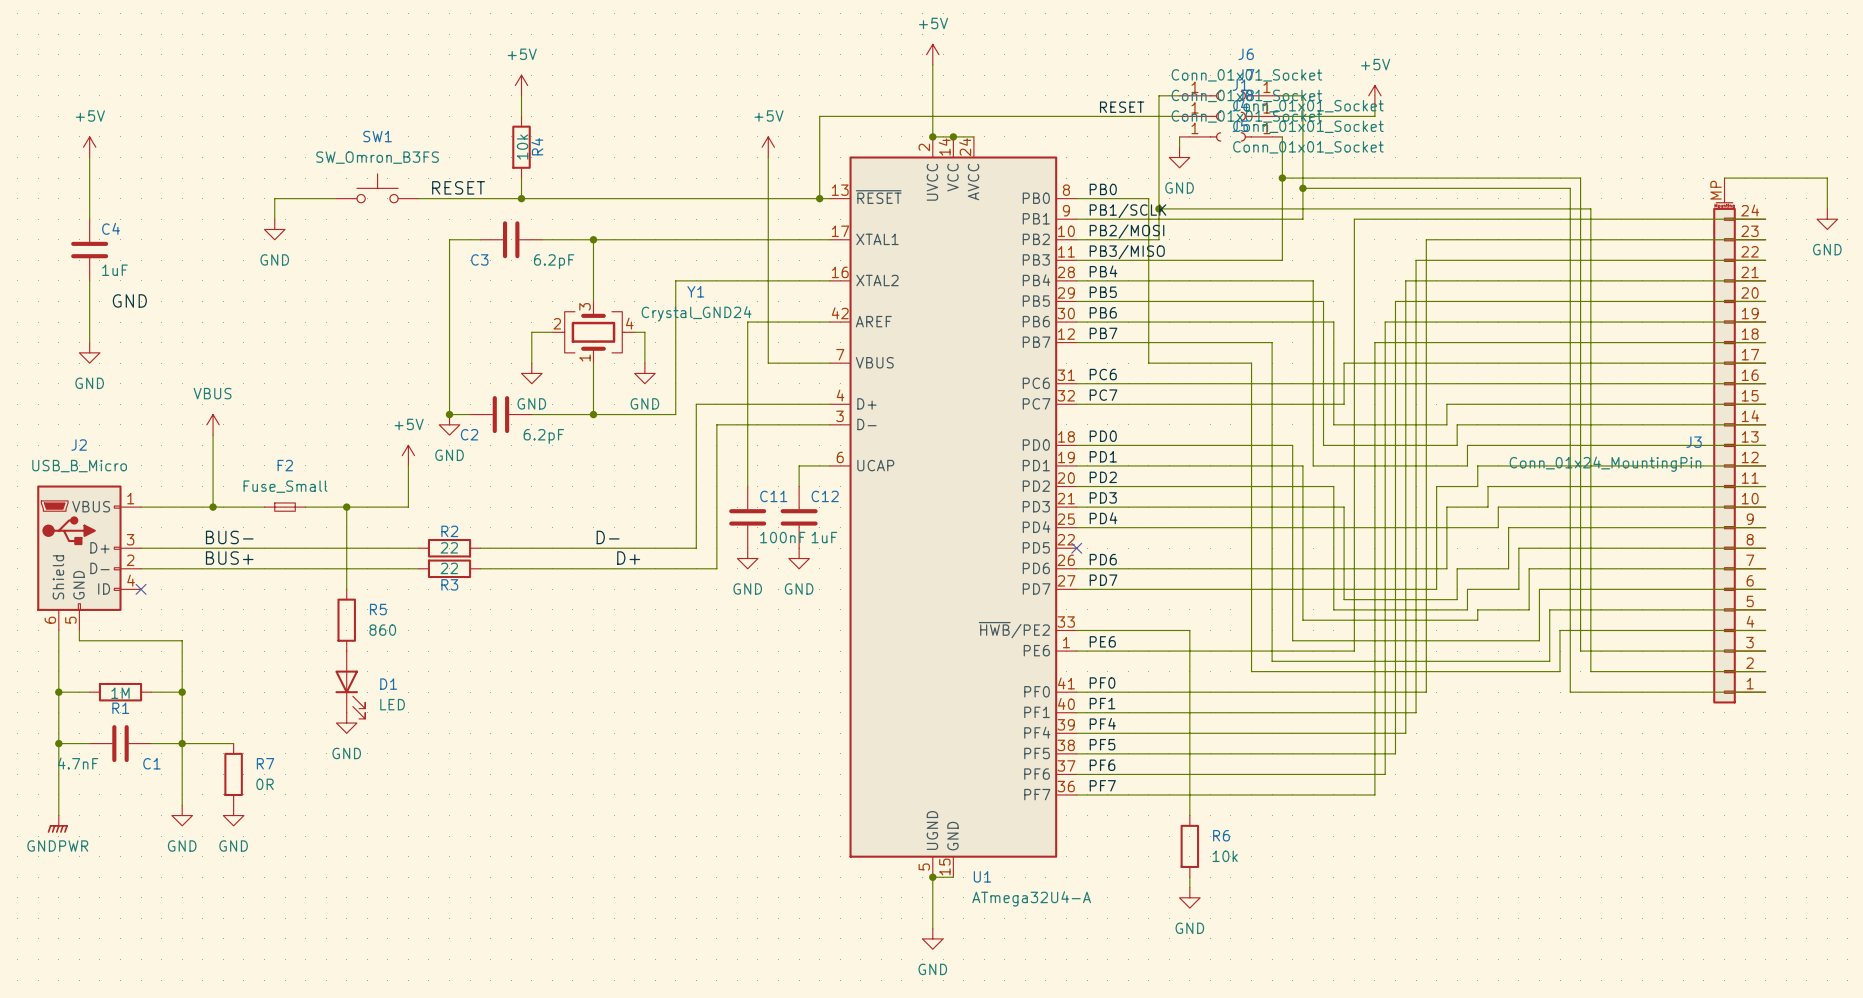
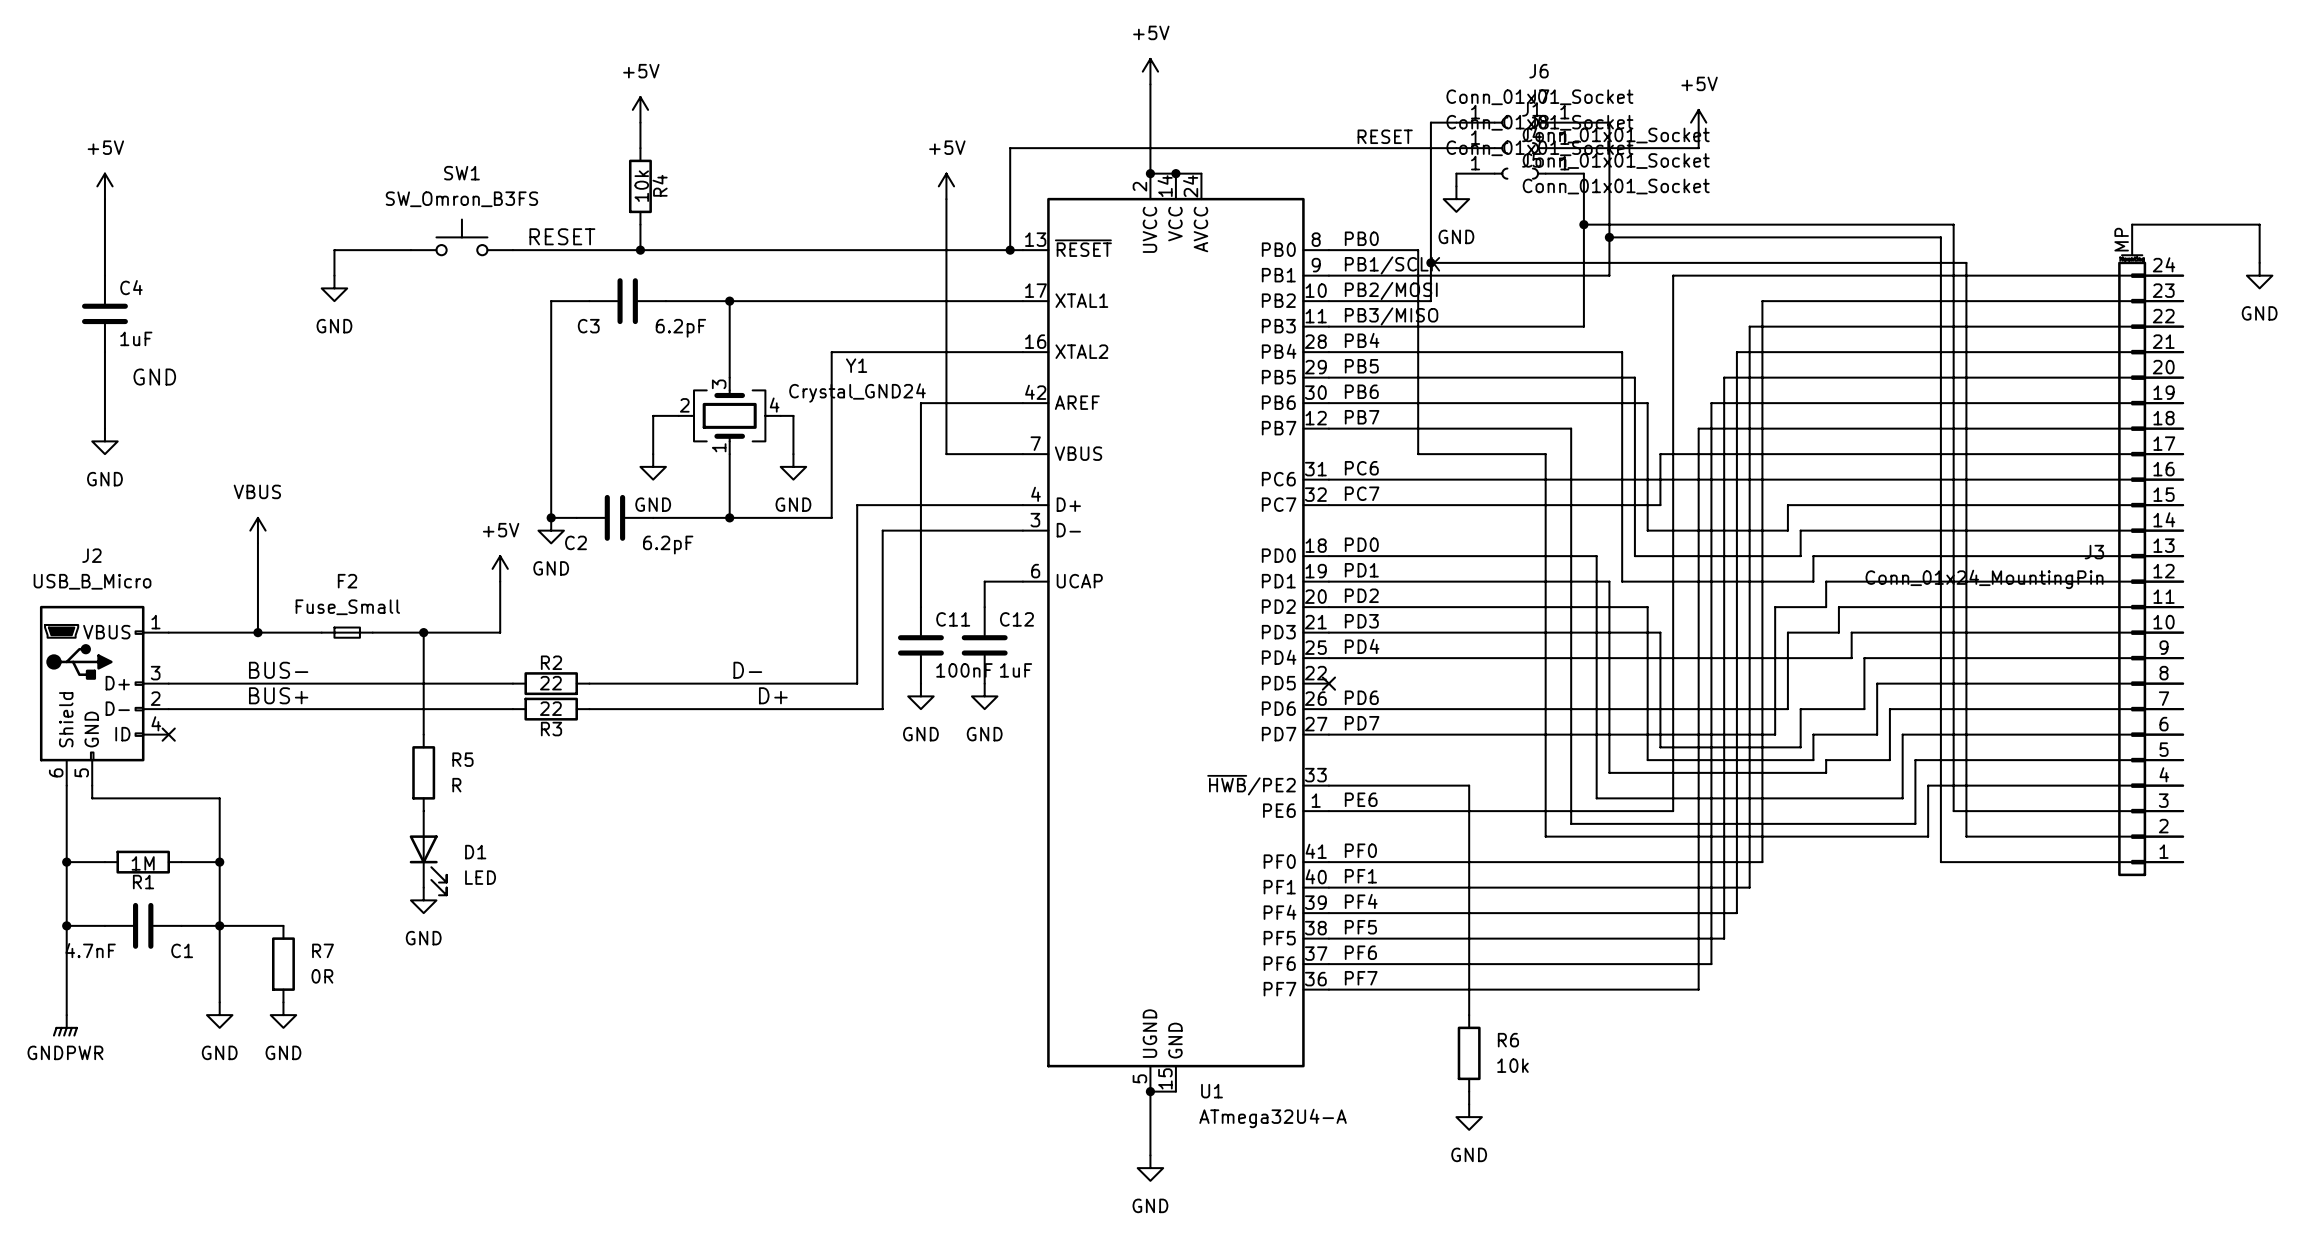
R5 value: 860 (382, 630) -> R (456, 785)

